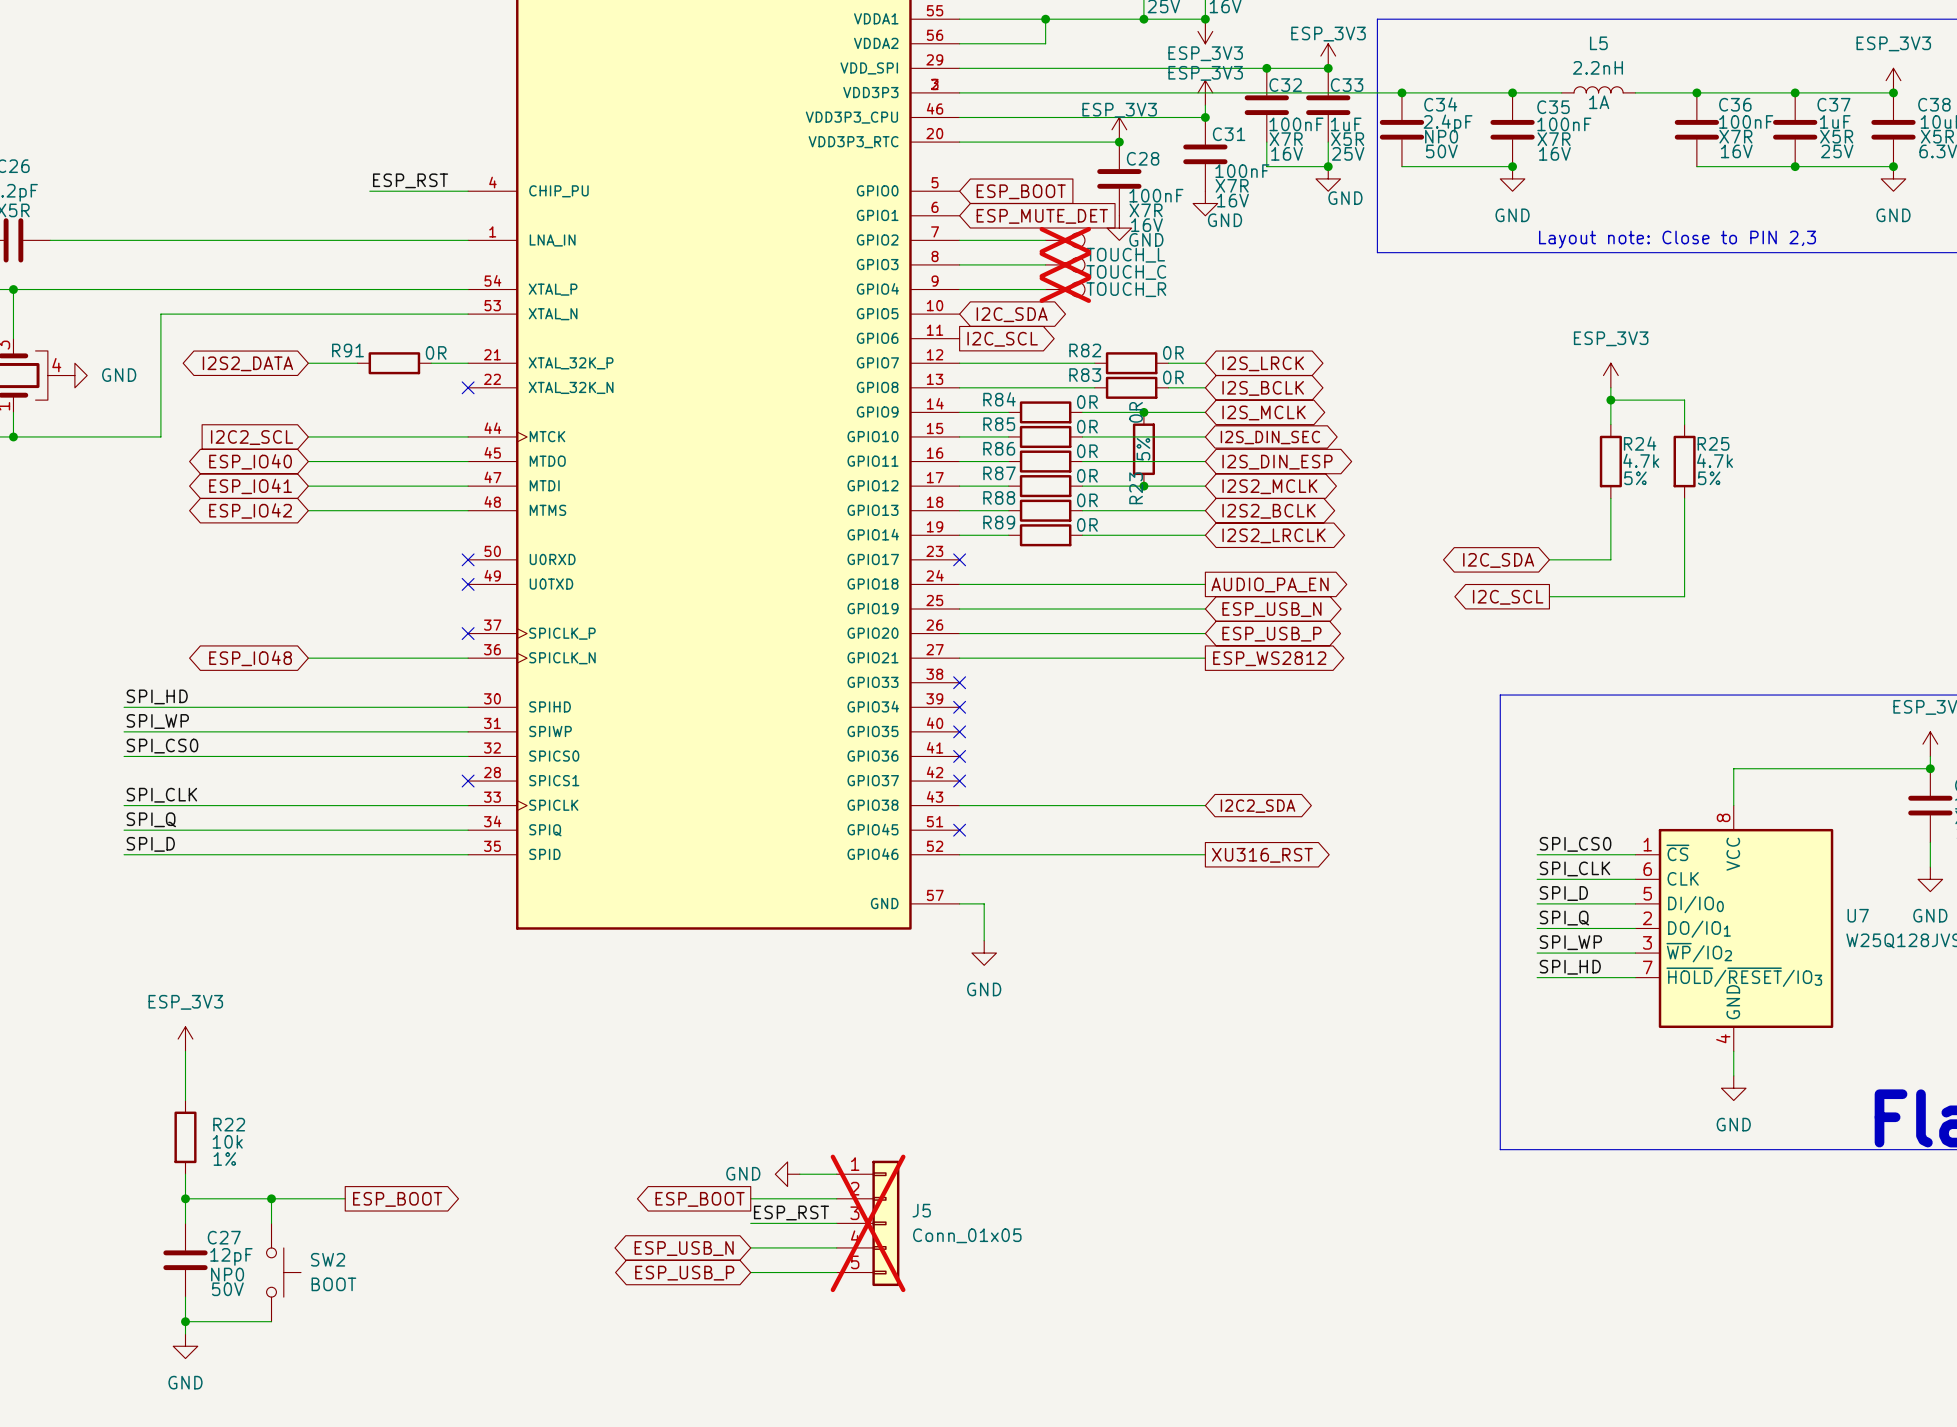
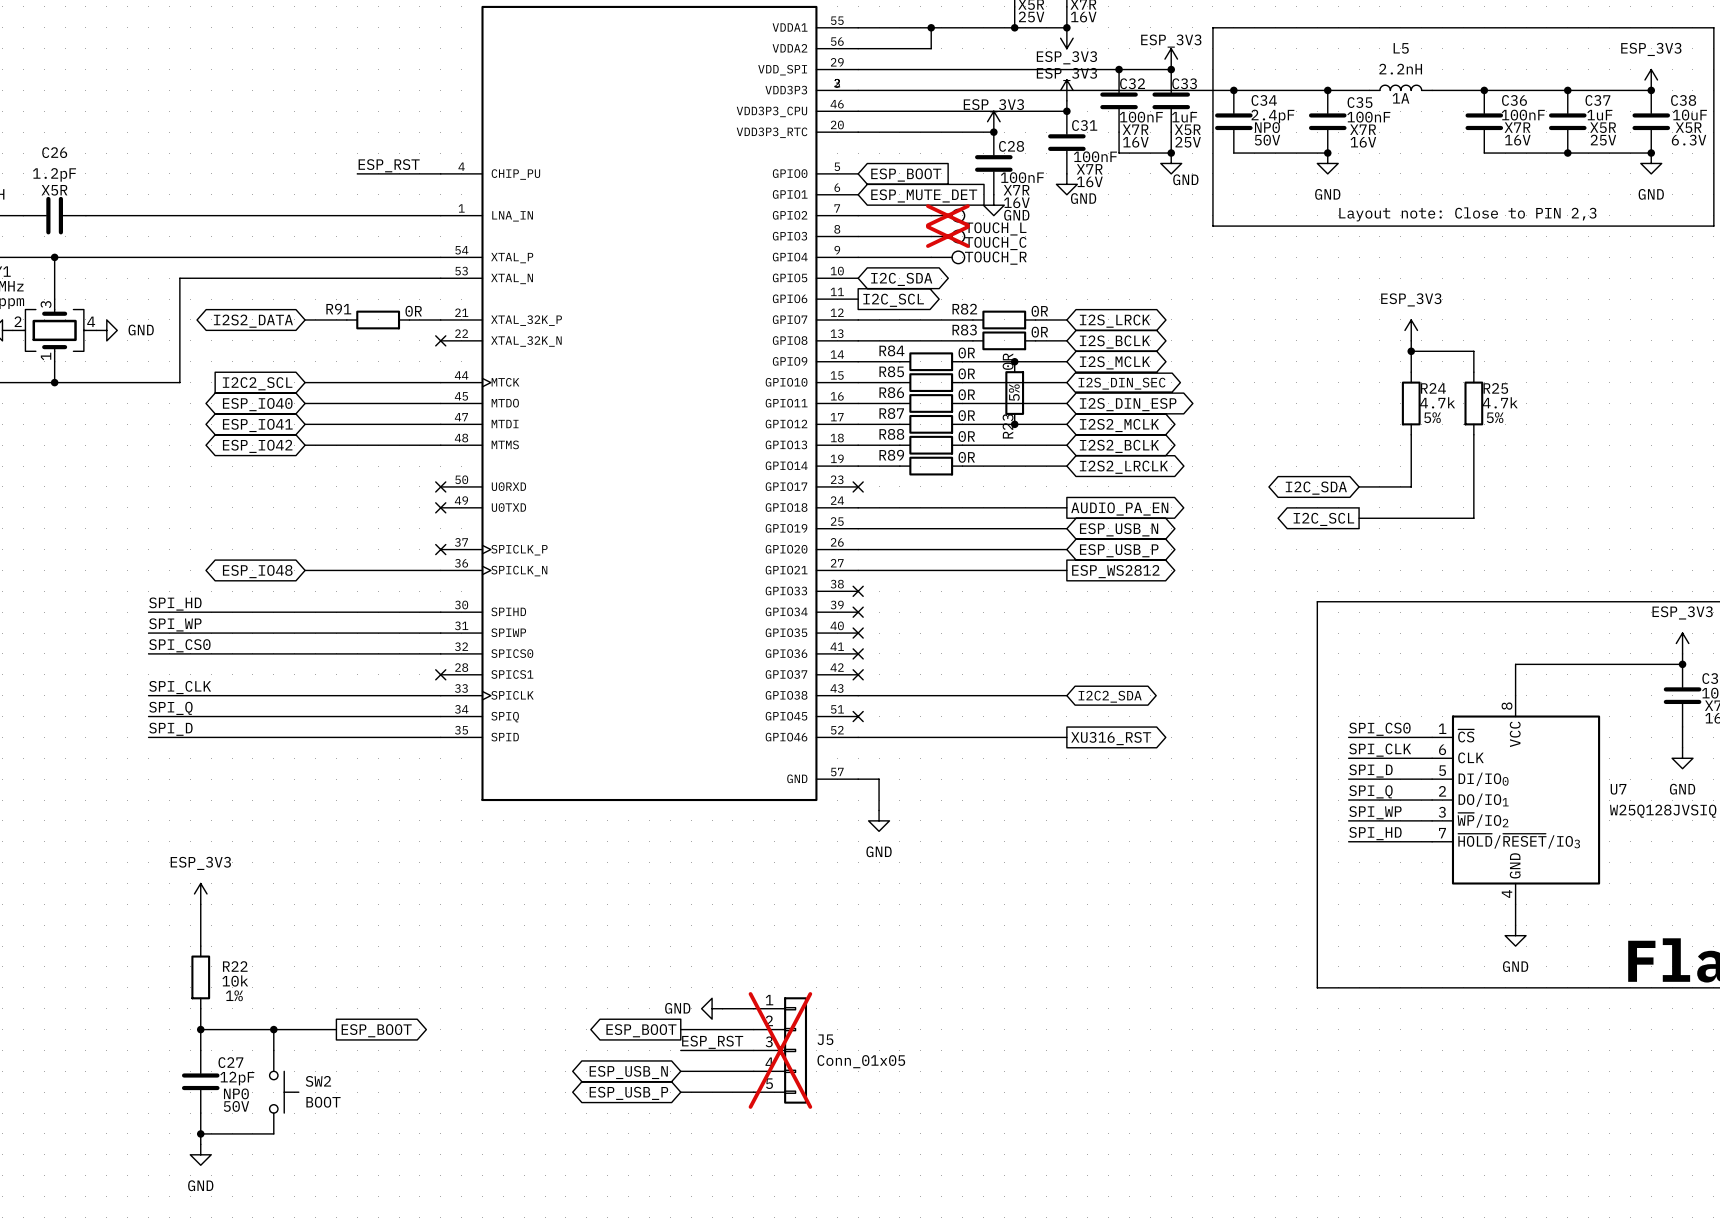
part do-not-place cross: (1065, 289) -> none

